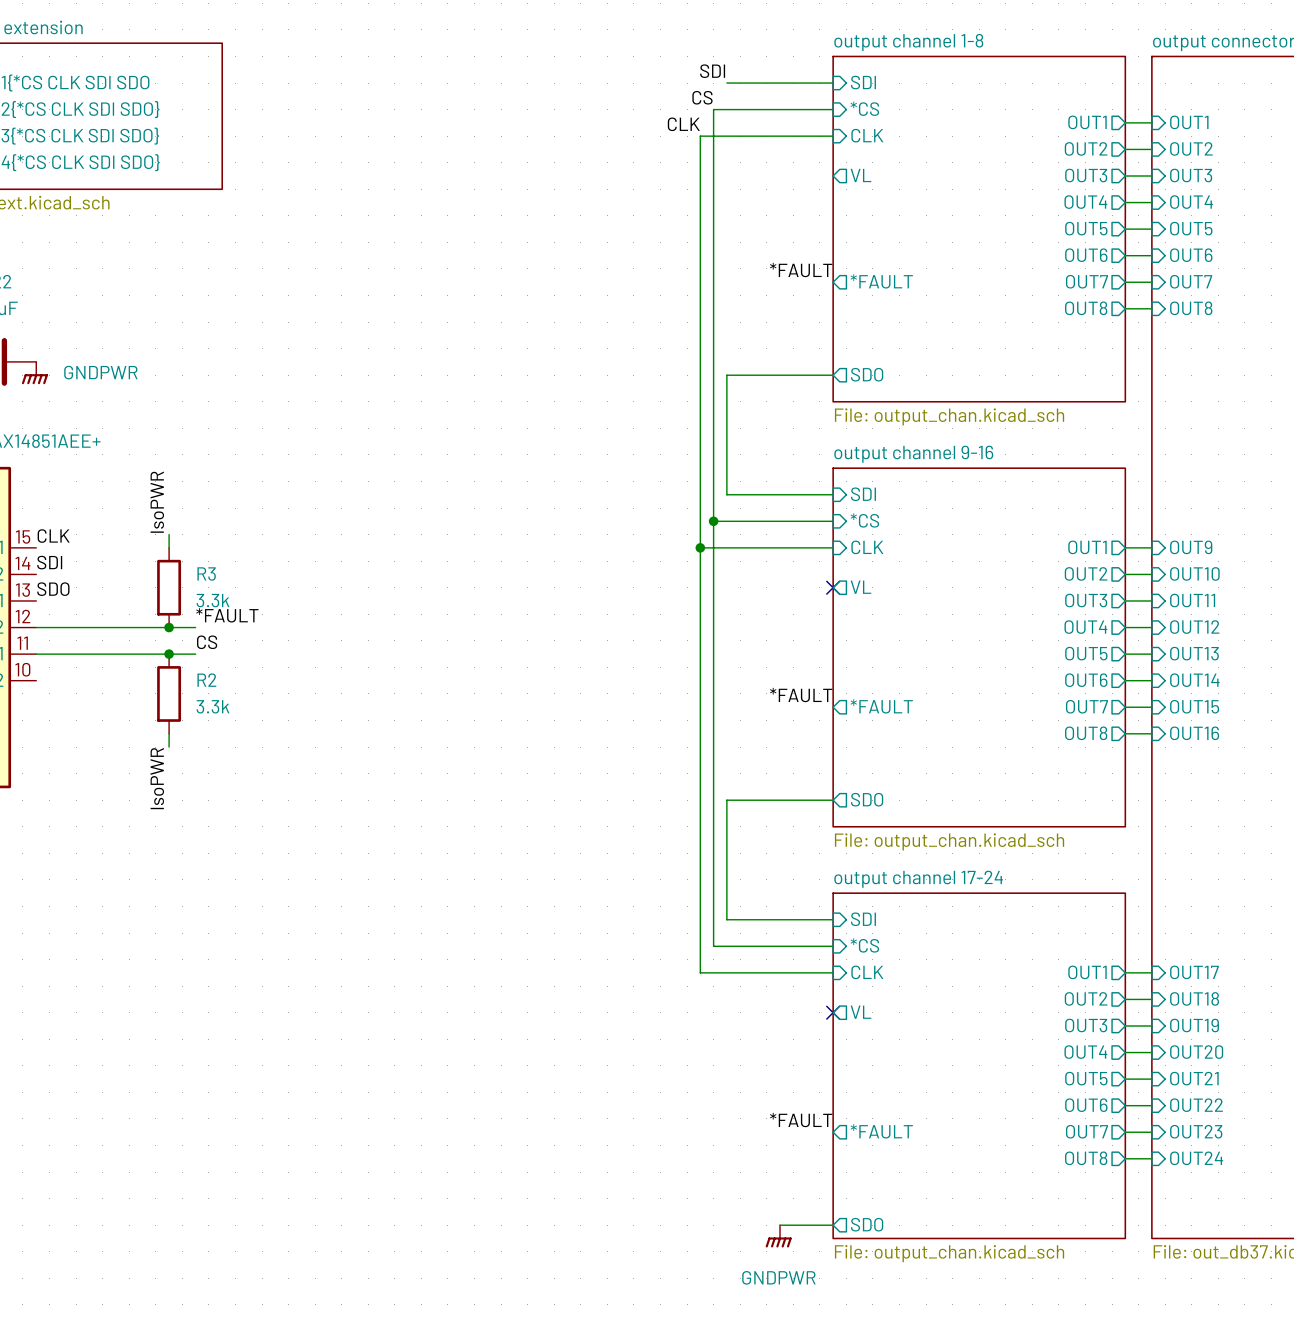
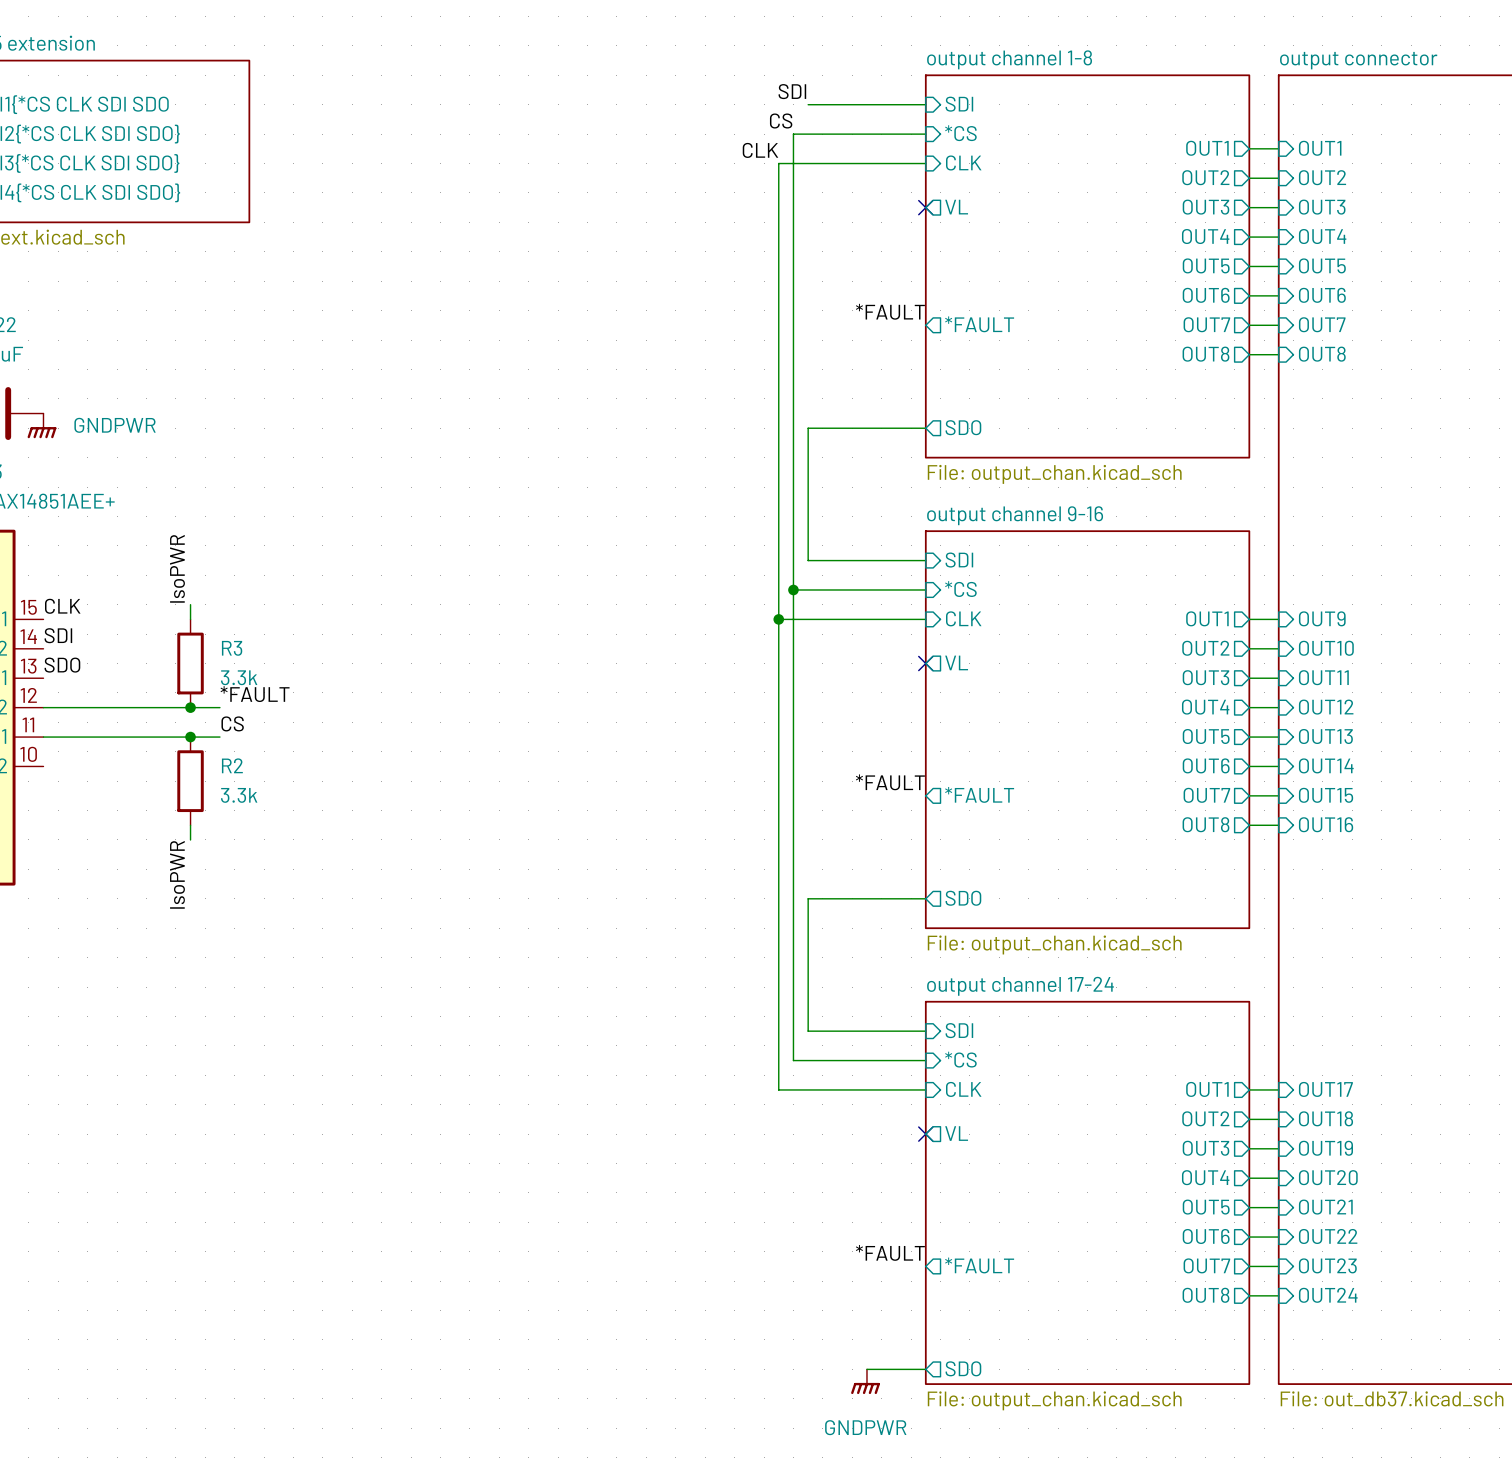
no-connect mark: none -> (925, 207)

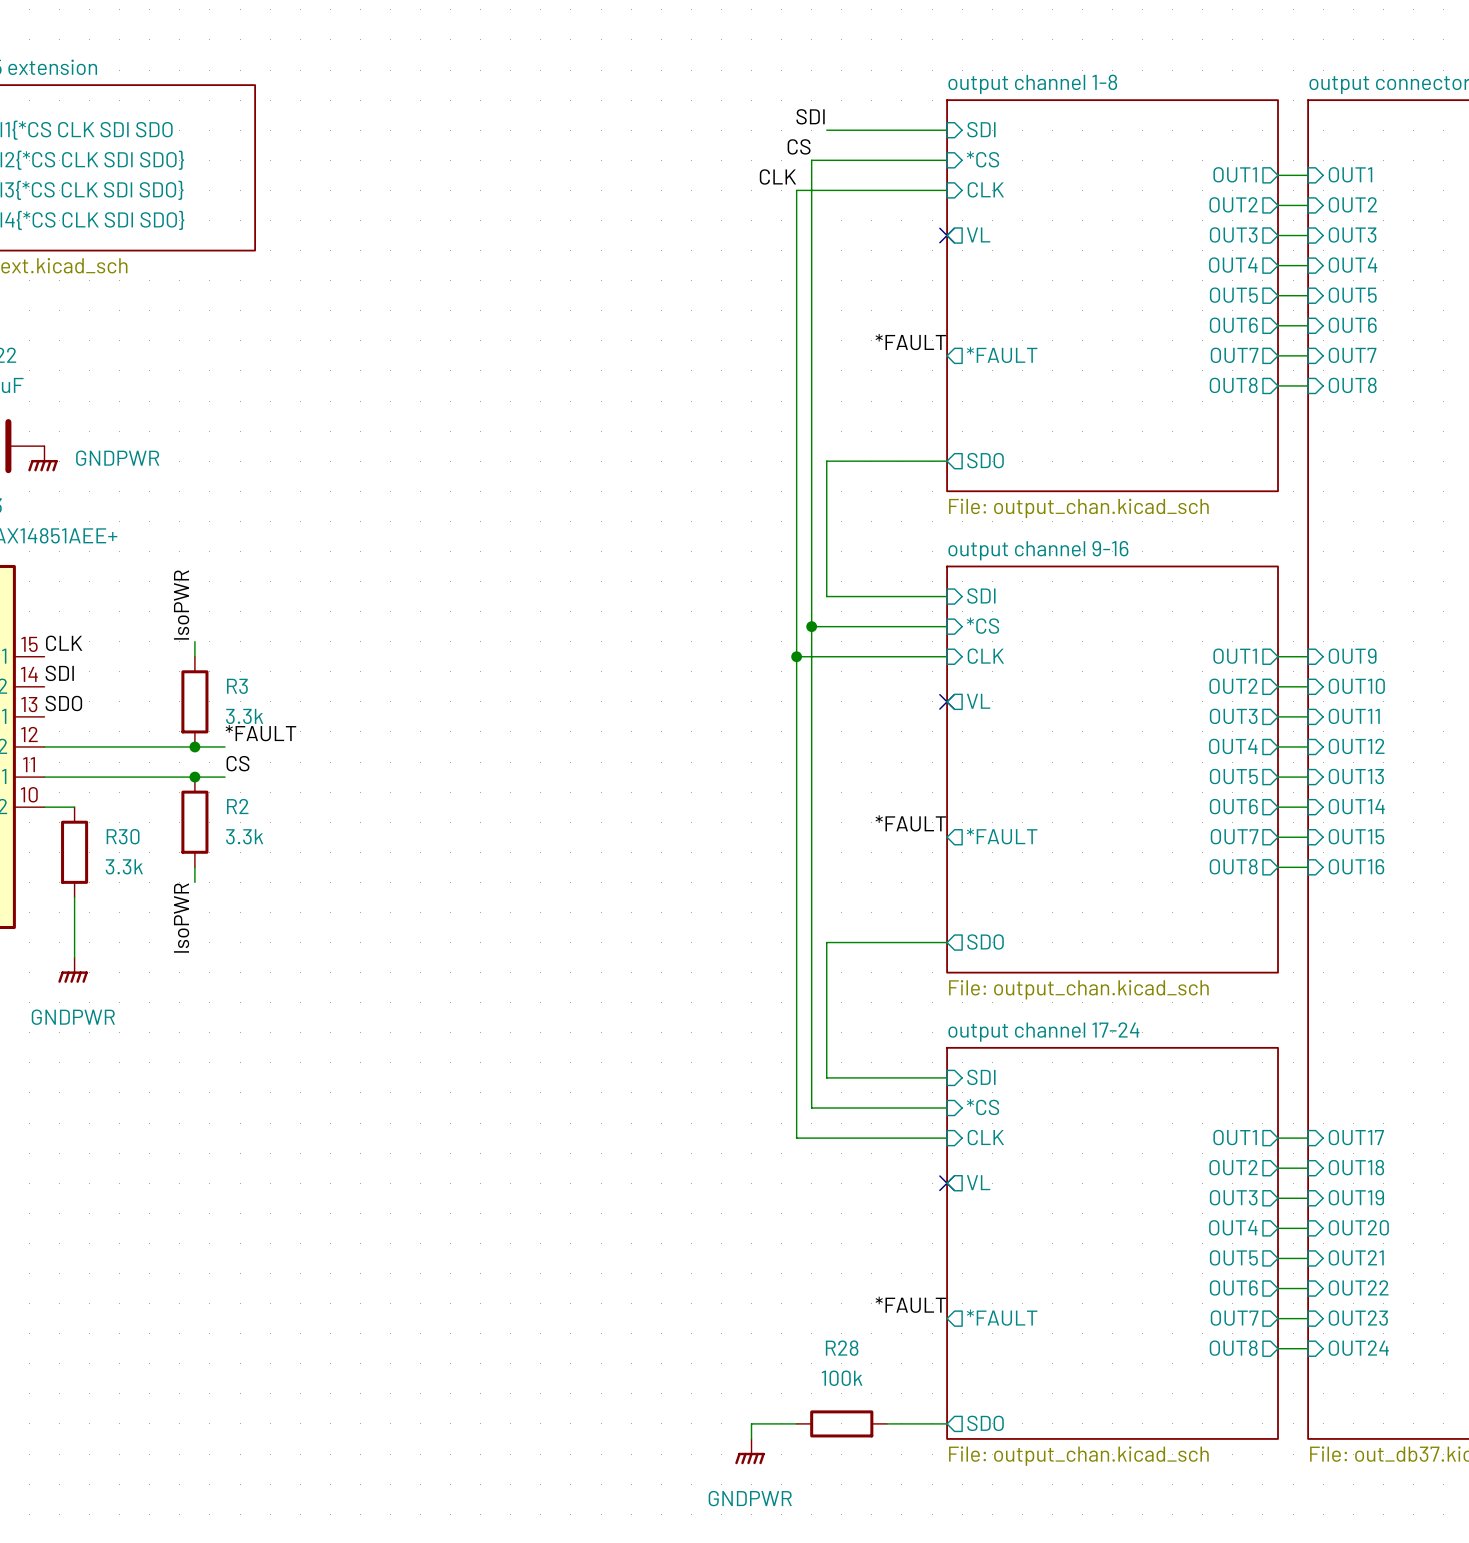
wire: none -> (44, 807) (74, 807)
R30: none -> 3.3k (74, 852)
wire: none -> (74, 897) (74, 957)
power symbol: none -> GNDPWR (73, 970)
wire: none -> (796, 1423) (751, 1423) (751, 1438)
R28: none -> 100k (841, 1423)
power symbol position: GNDPWR (865, 1381) -> GNDPWR (750, 1451)

